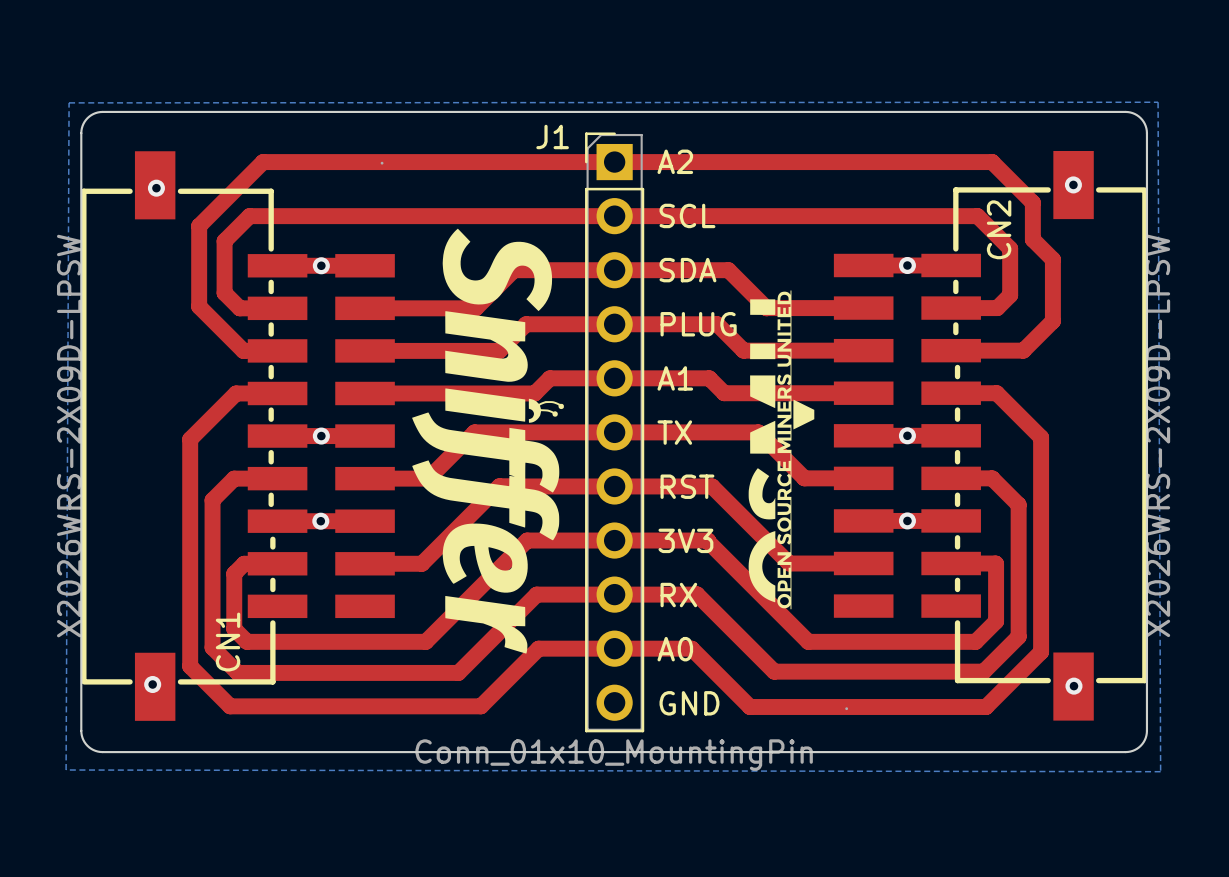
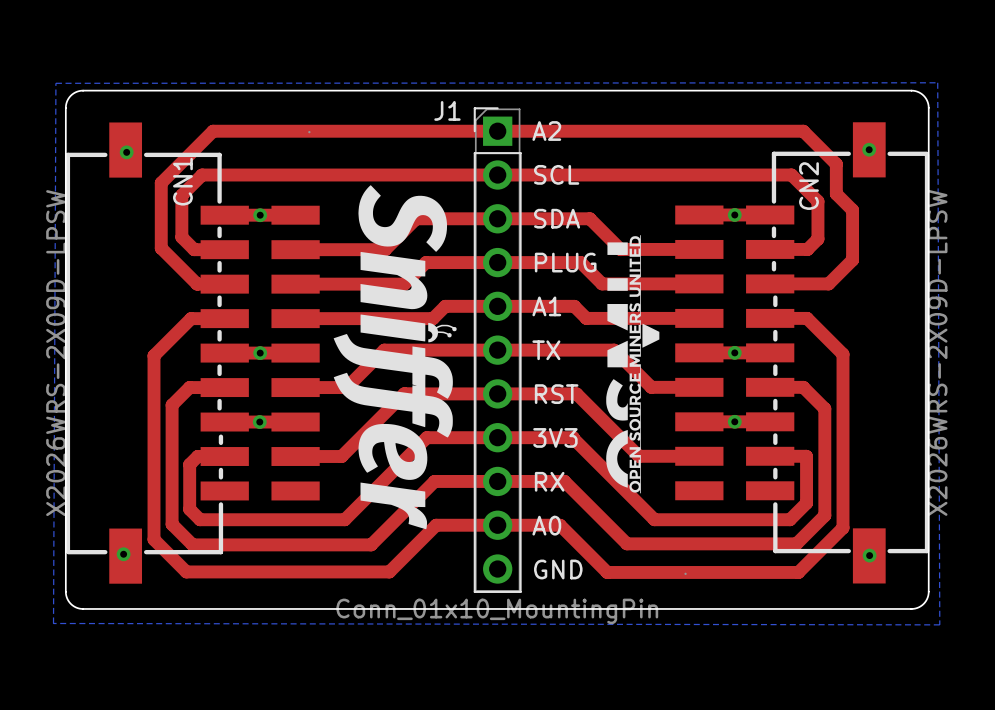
CN1 name position: CN1 (228, 642) -> CN1 (182, 181)

